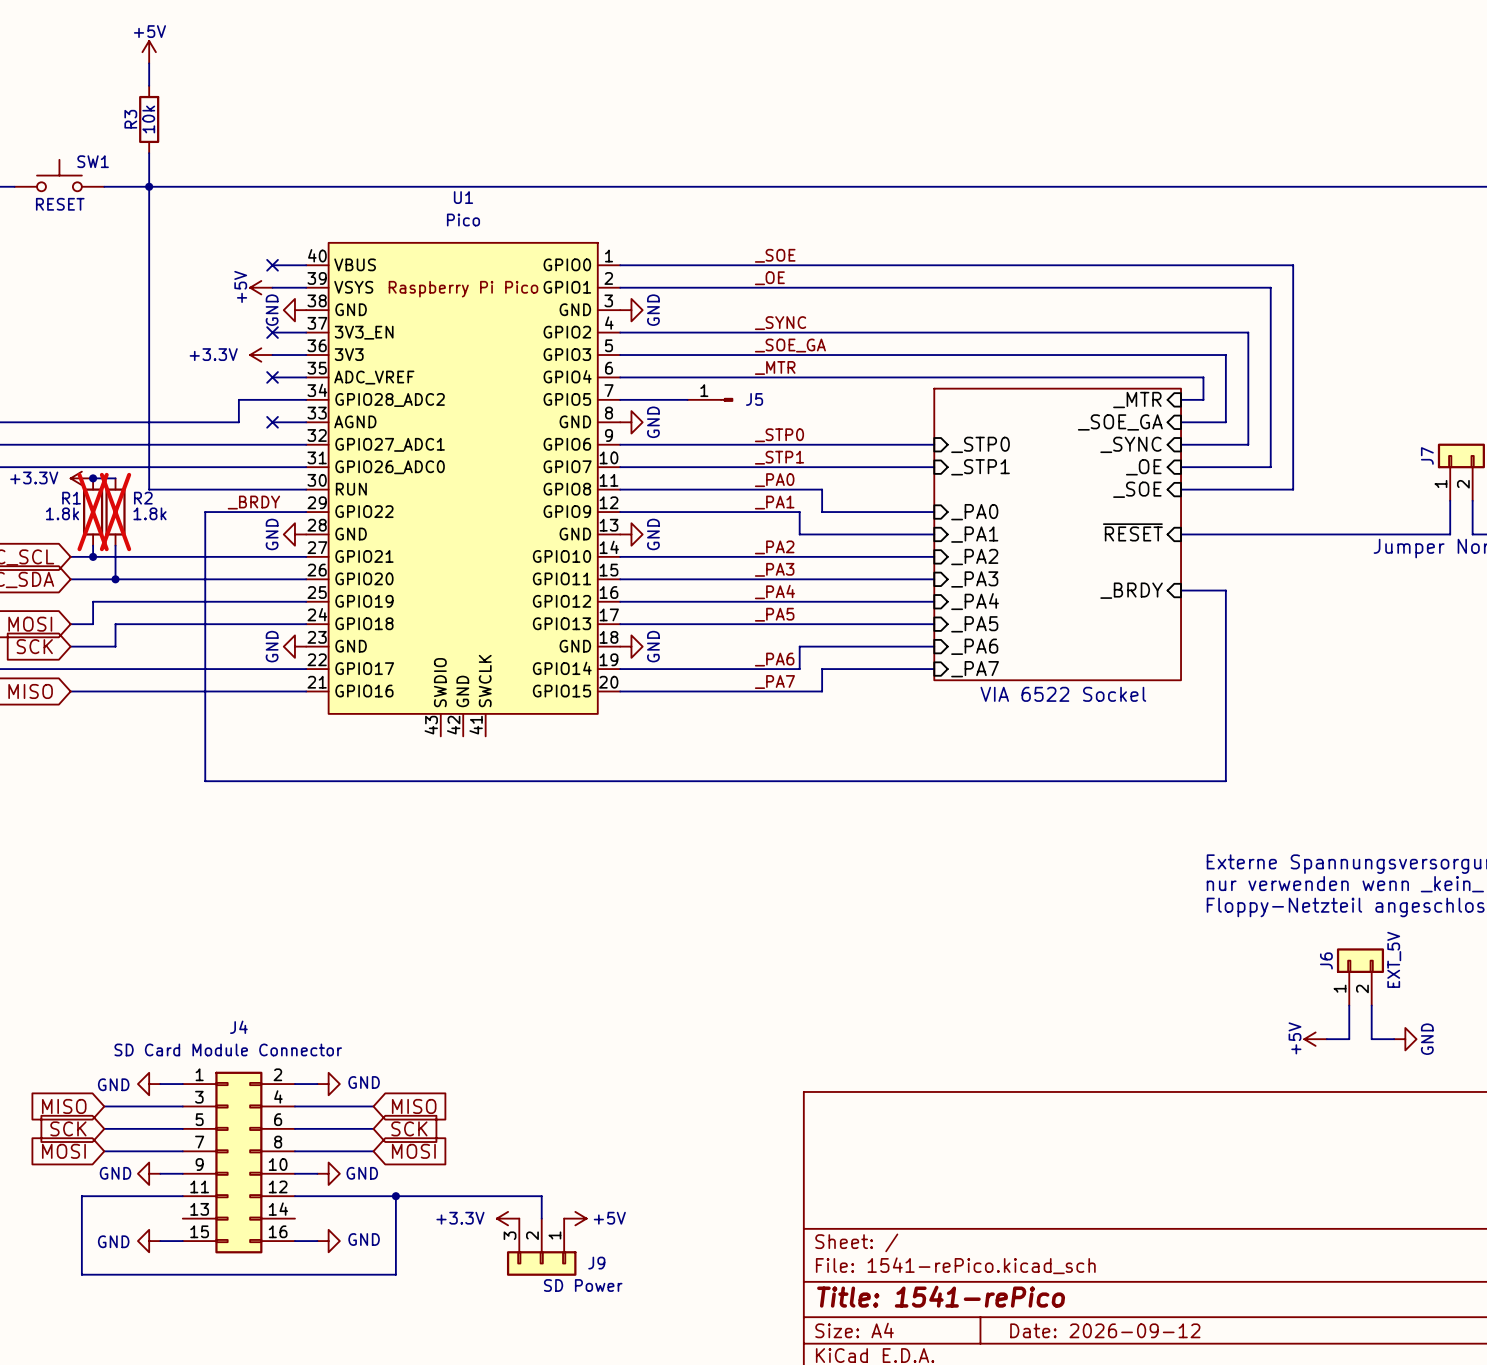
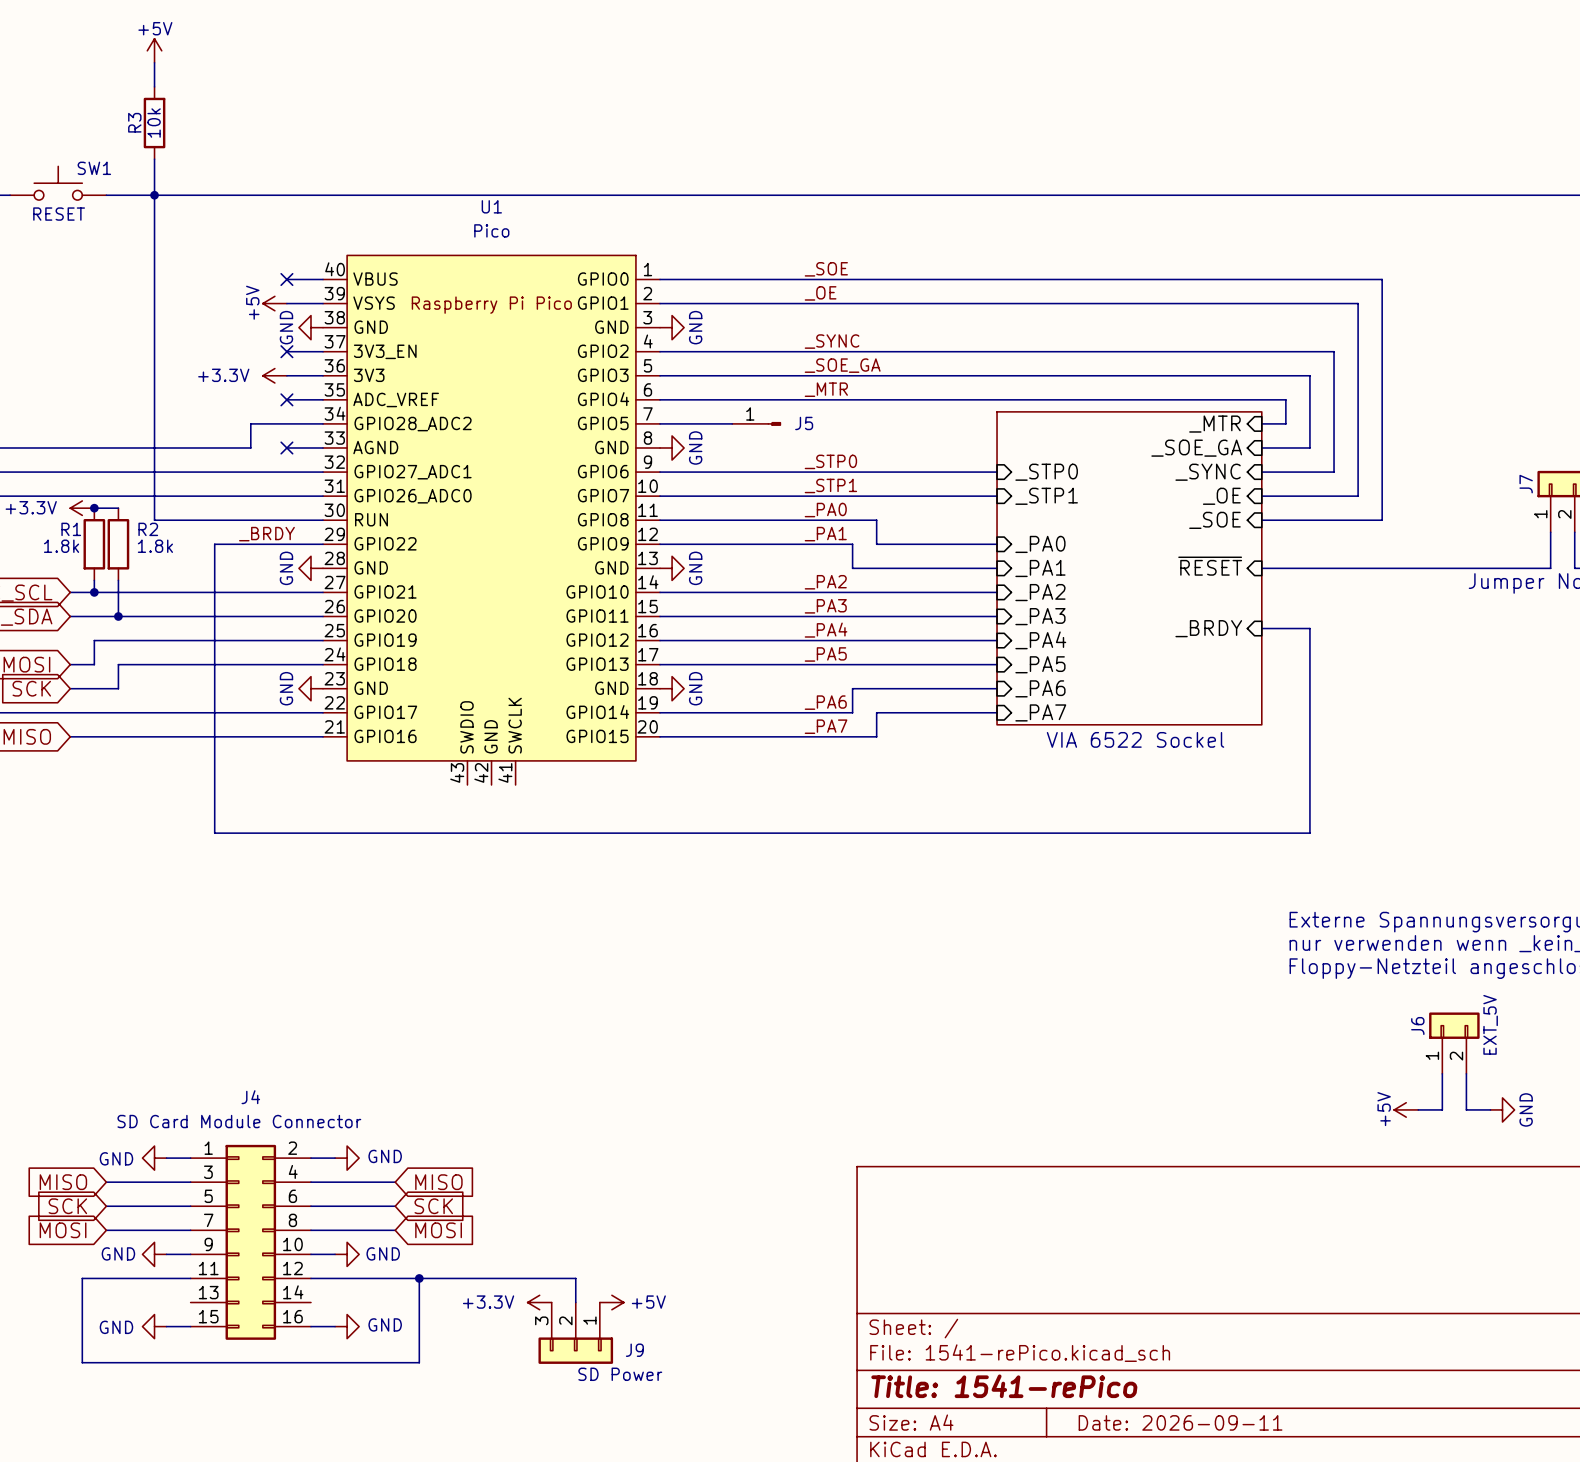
R1 do-not-place cross: (93, 512) -> none
R2 do-not-place cross: (115, 512) -> none
title block: Date: 2026-09-12 (1105, 1330) -> Date: 2026-09-11 (1180, 1422)

